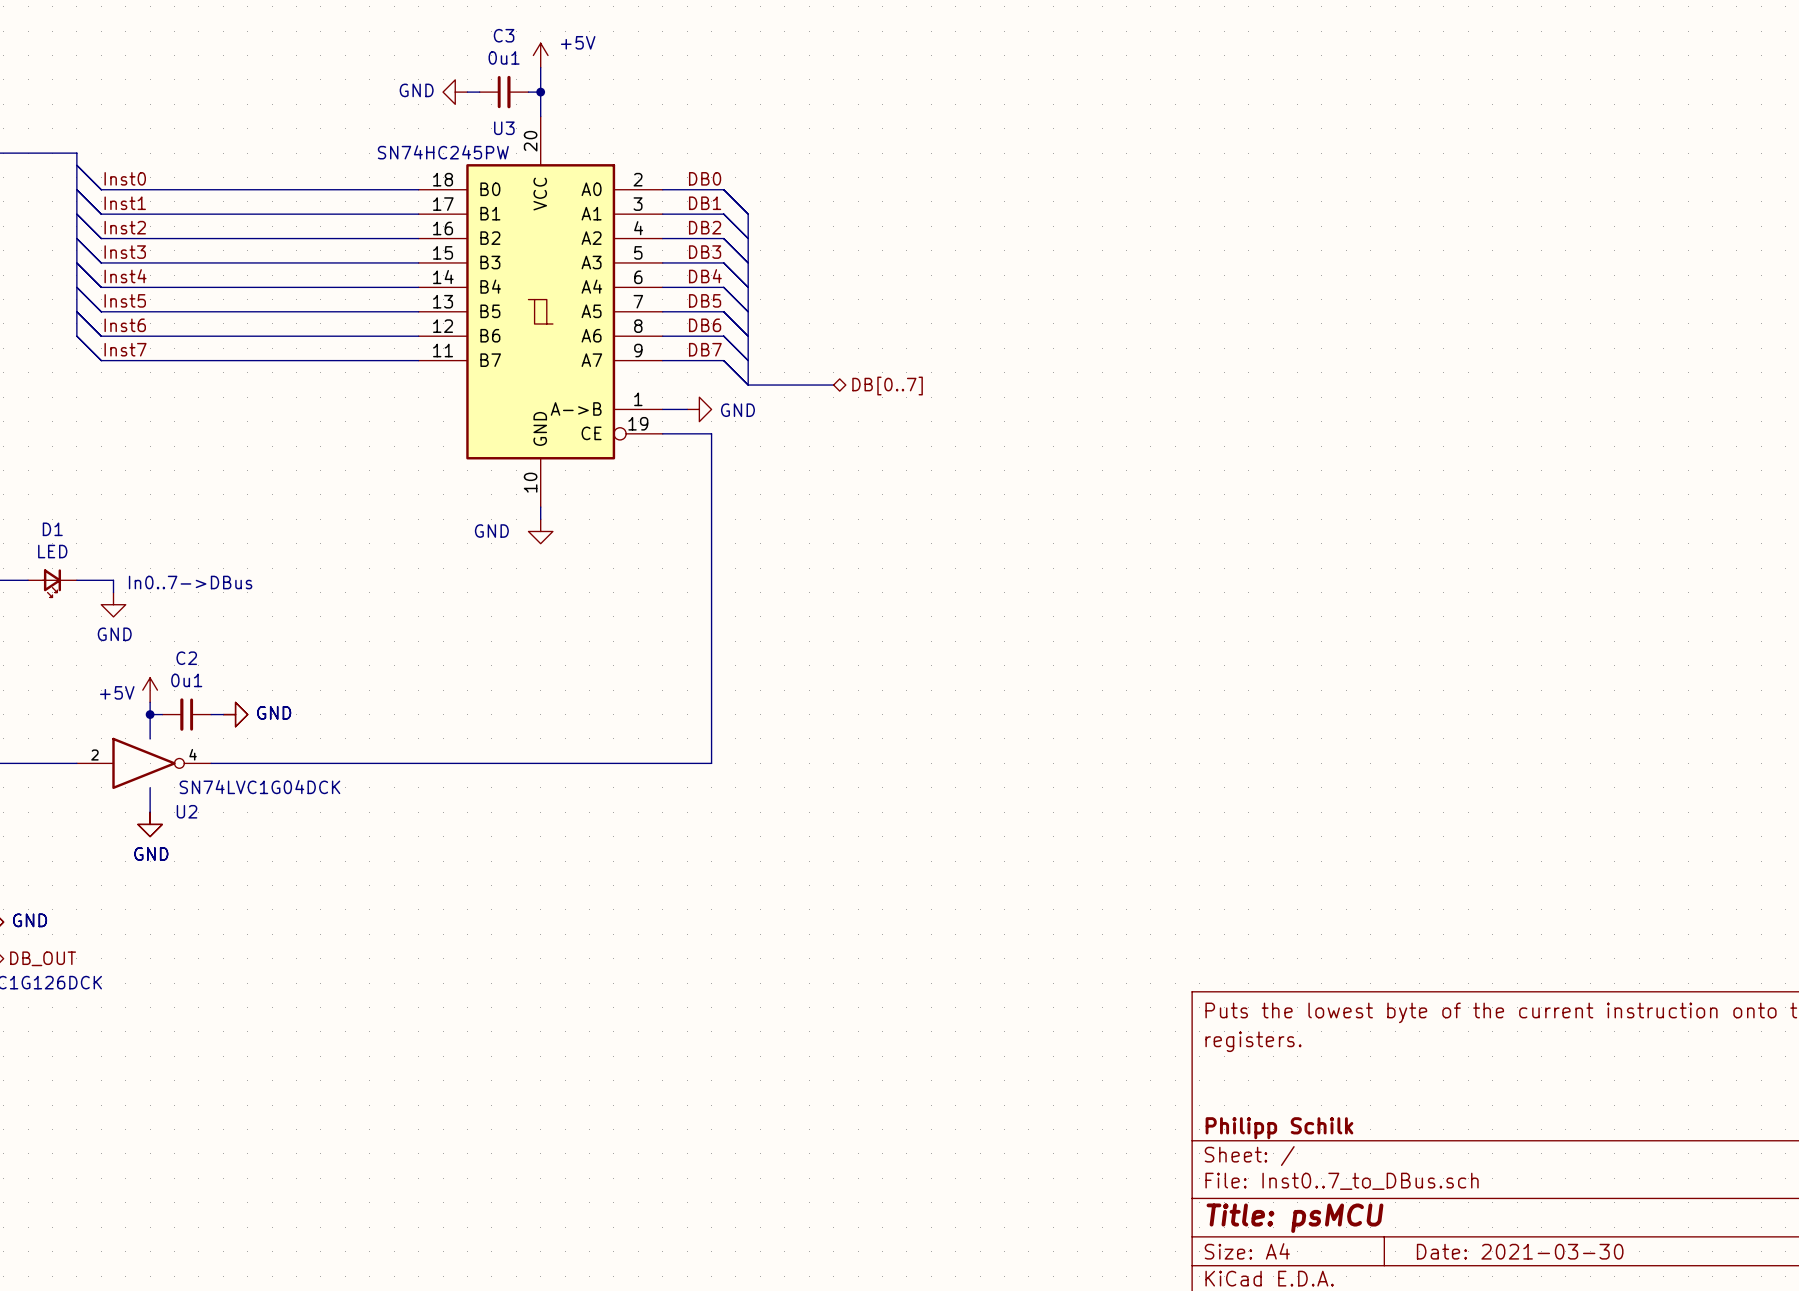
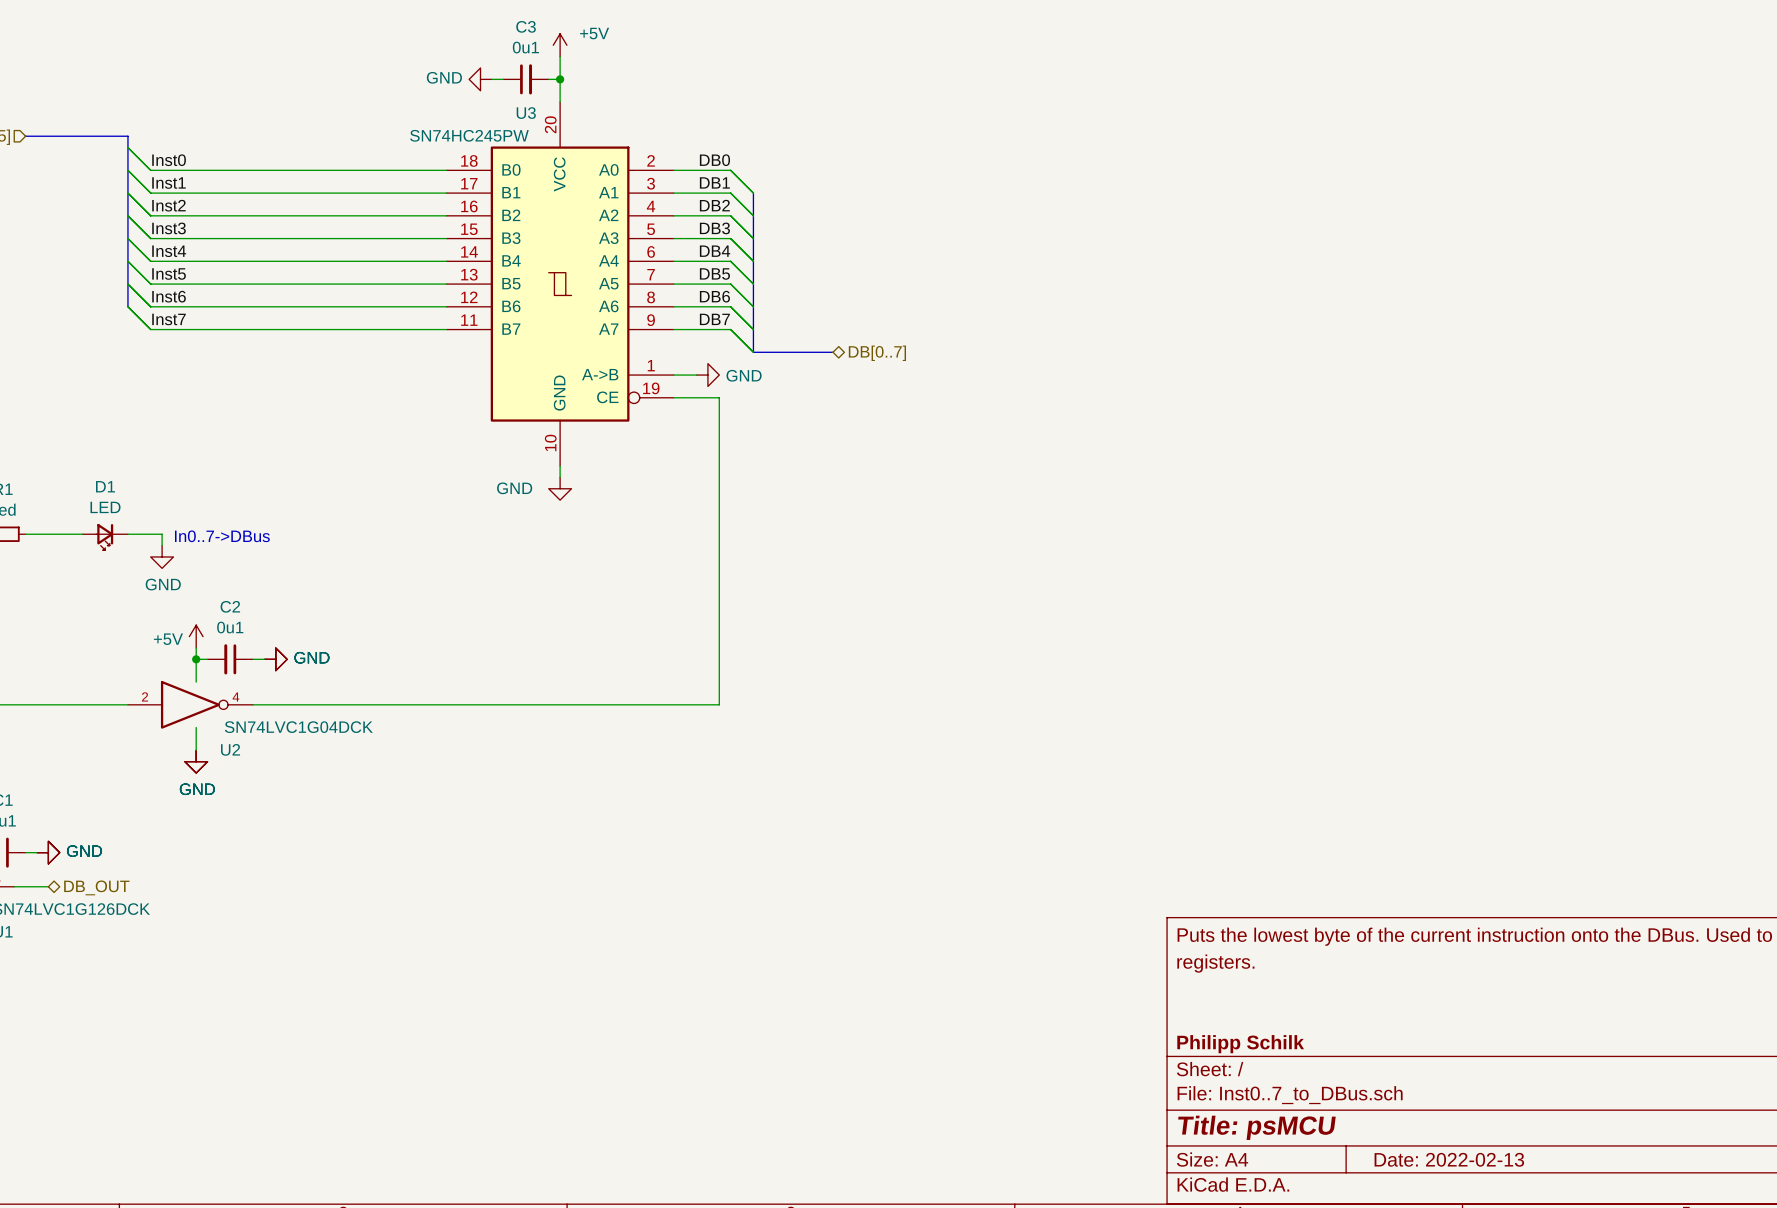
title block: Date: 2021-03-30 (1520, 1251) -> Date: 2022-02-13 (1449, 1159)

